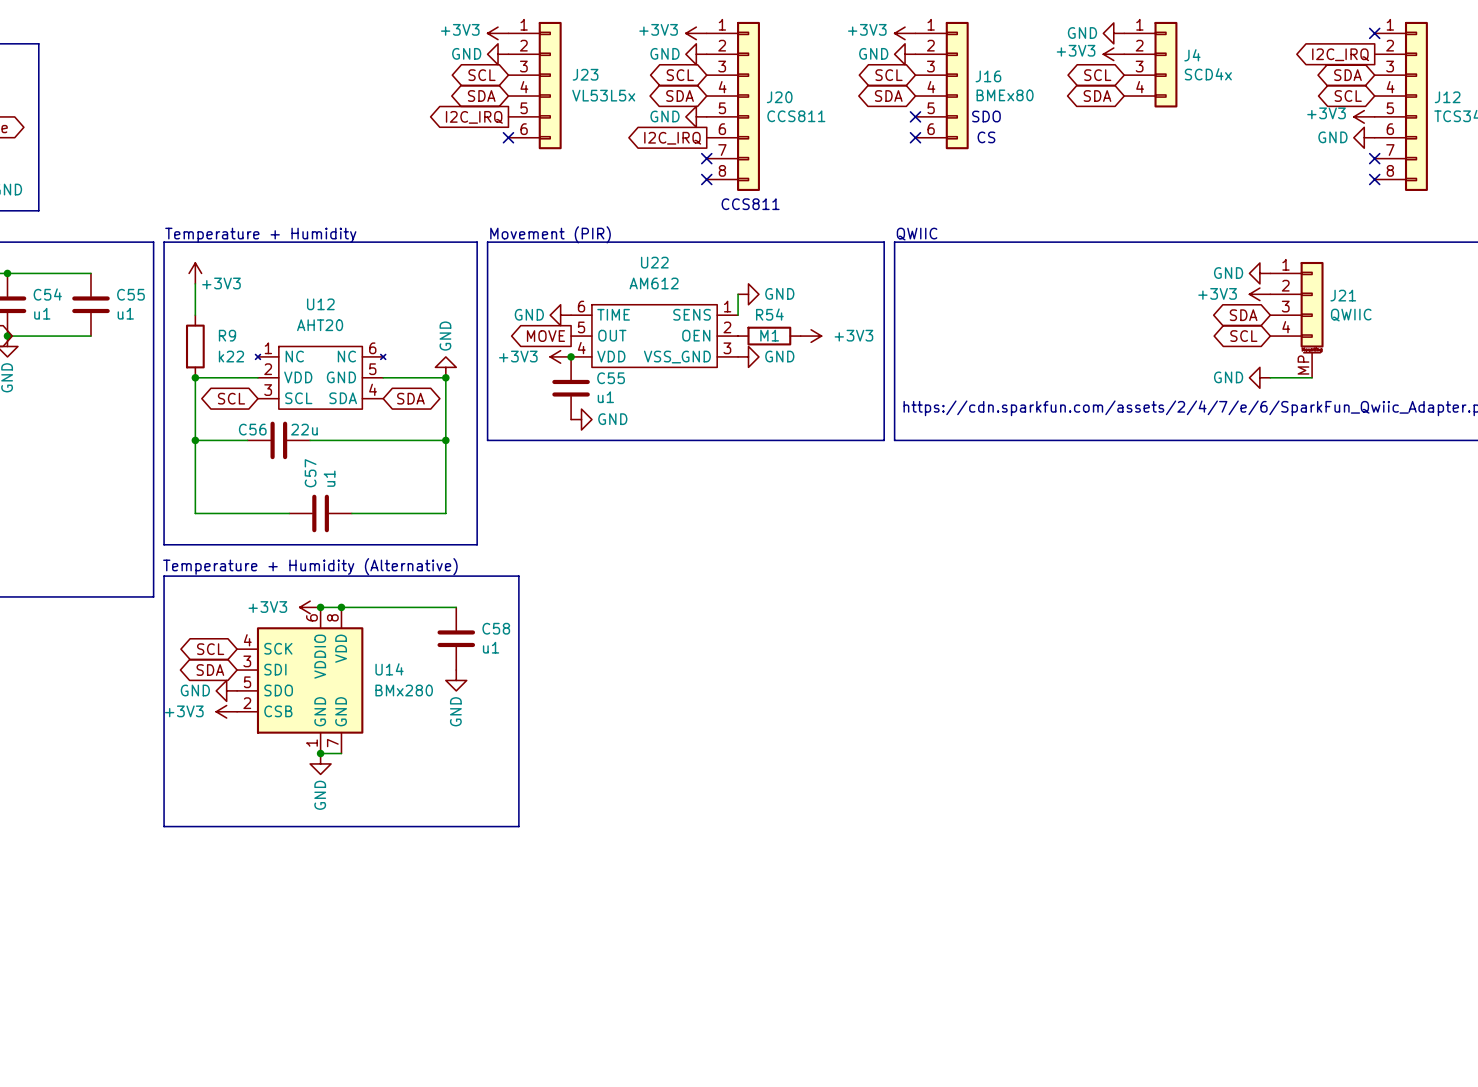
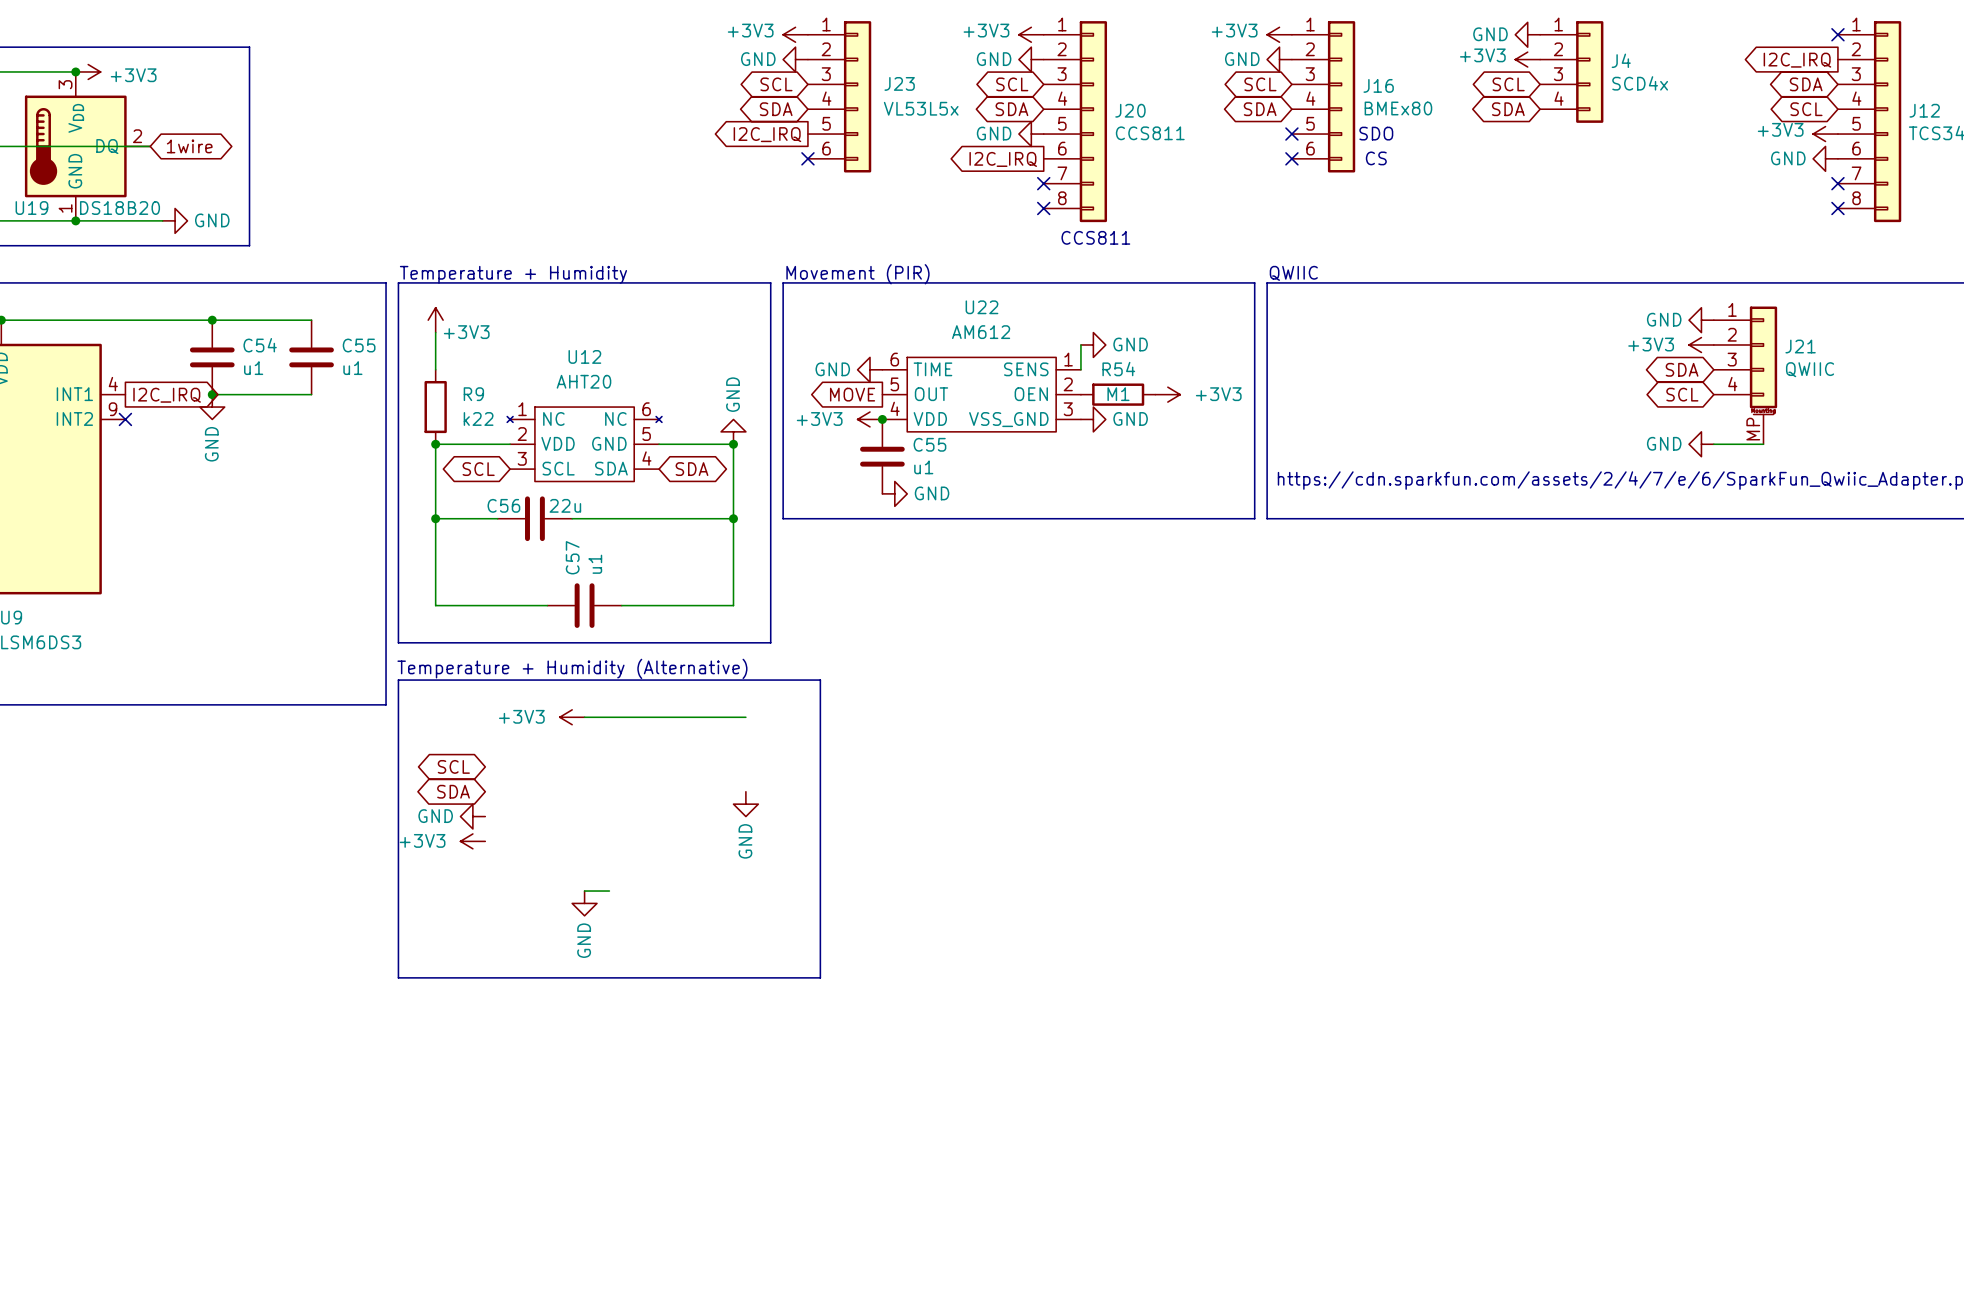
junction: (320, 607) -> none
junction: (341, 607) -> none
C58: u1 (456, 638) -> none
U14: BMx280 (300, 680) -> none
junction: (320, 753) -> none

